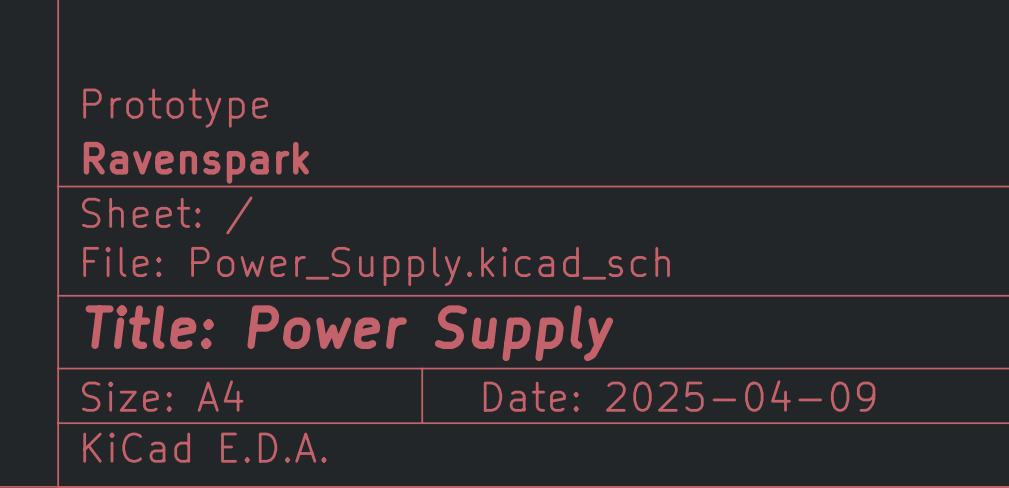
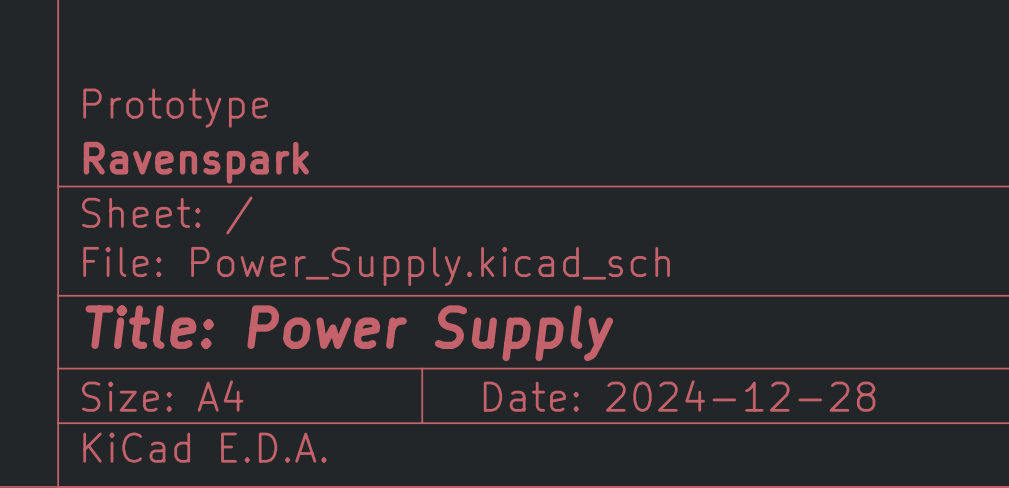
title block: Date: 2025-04-09 (679, 396) -> Date: 2024-12-28 (679, 396)

